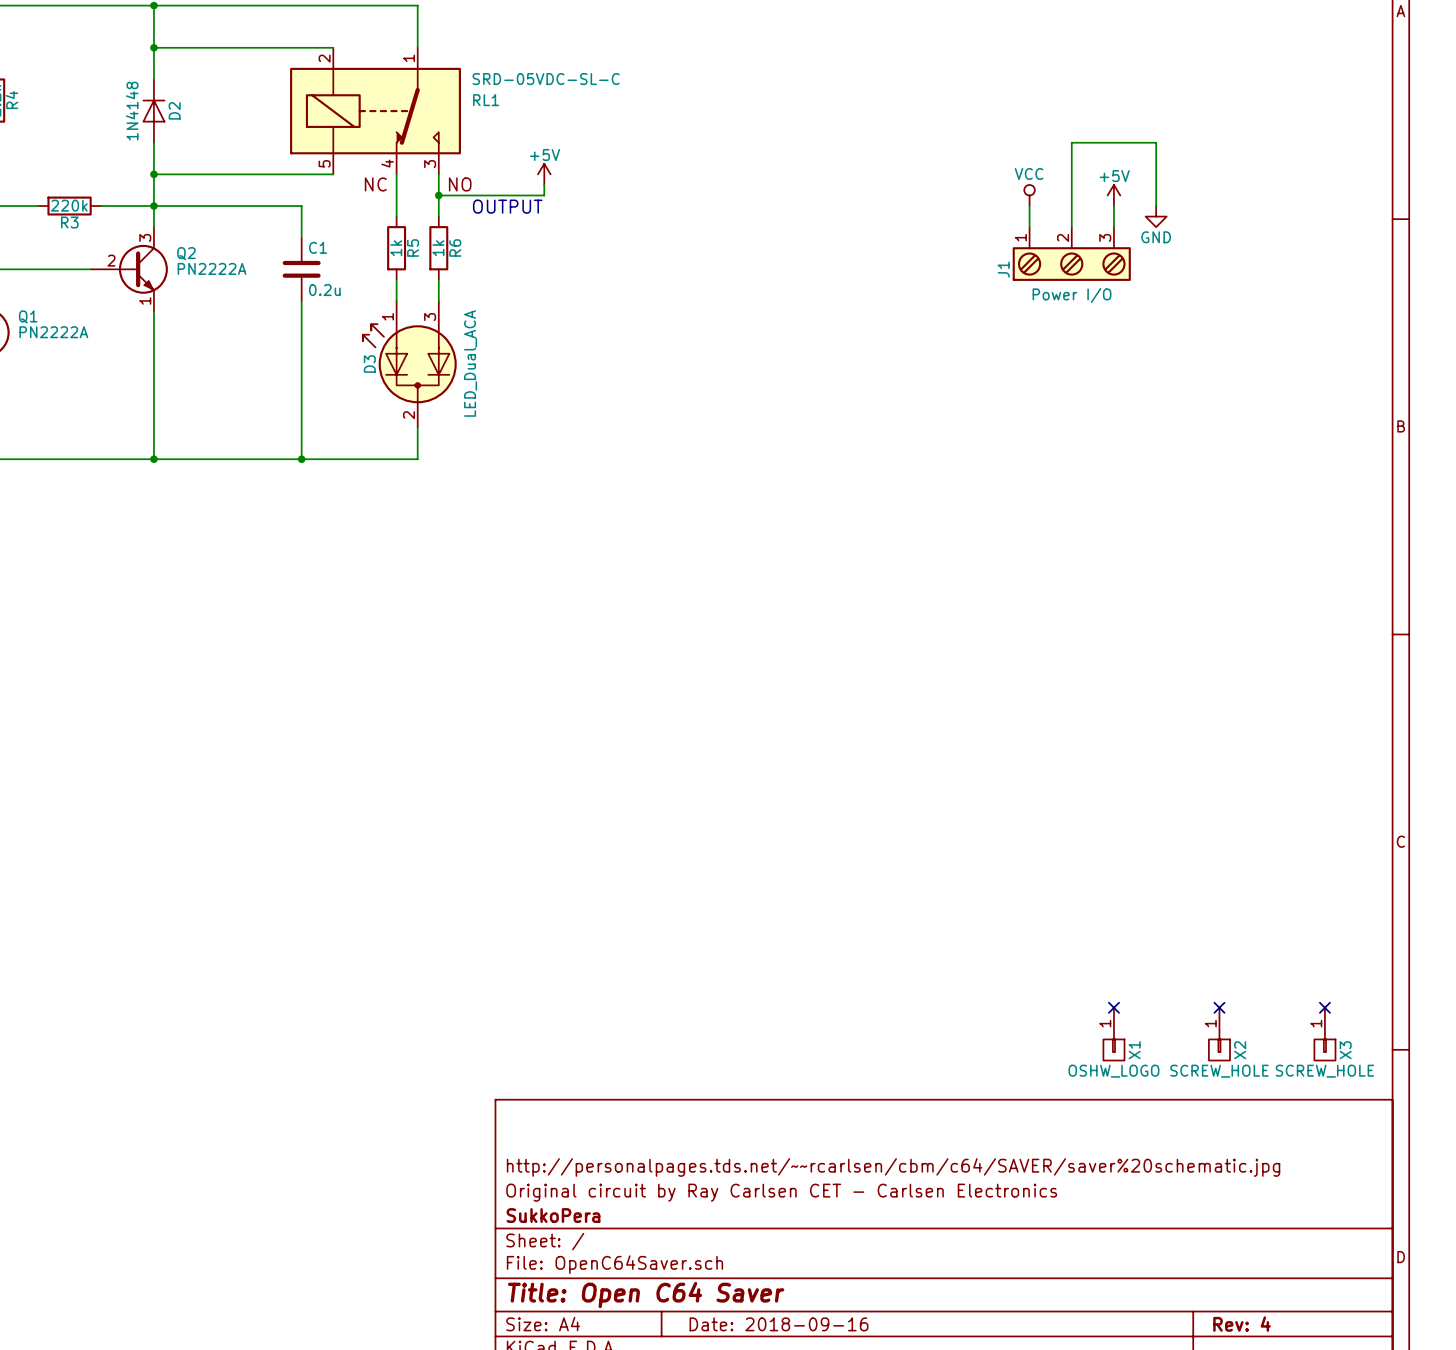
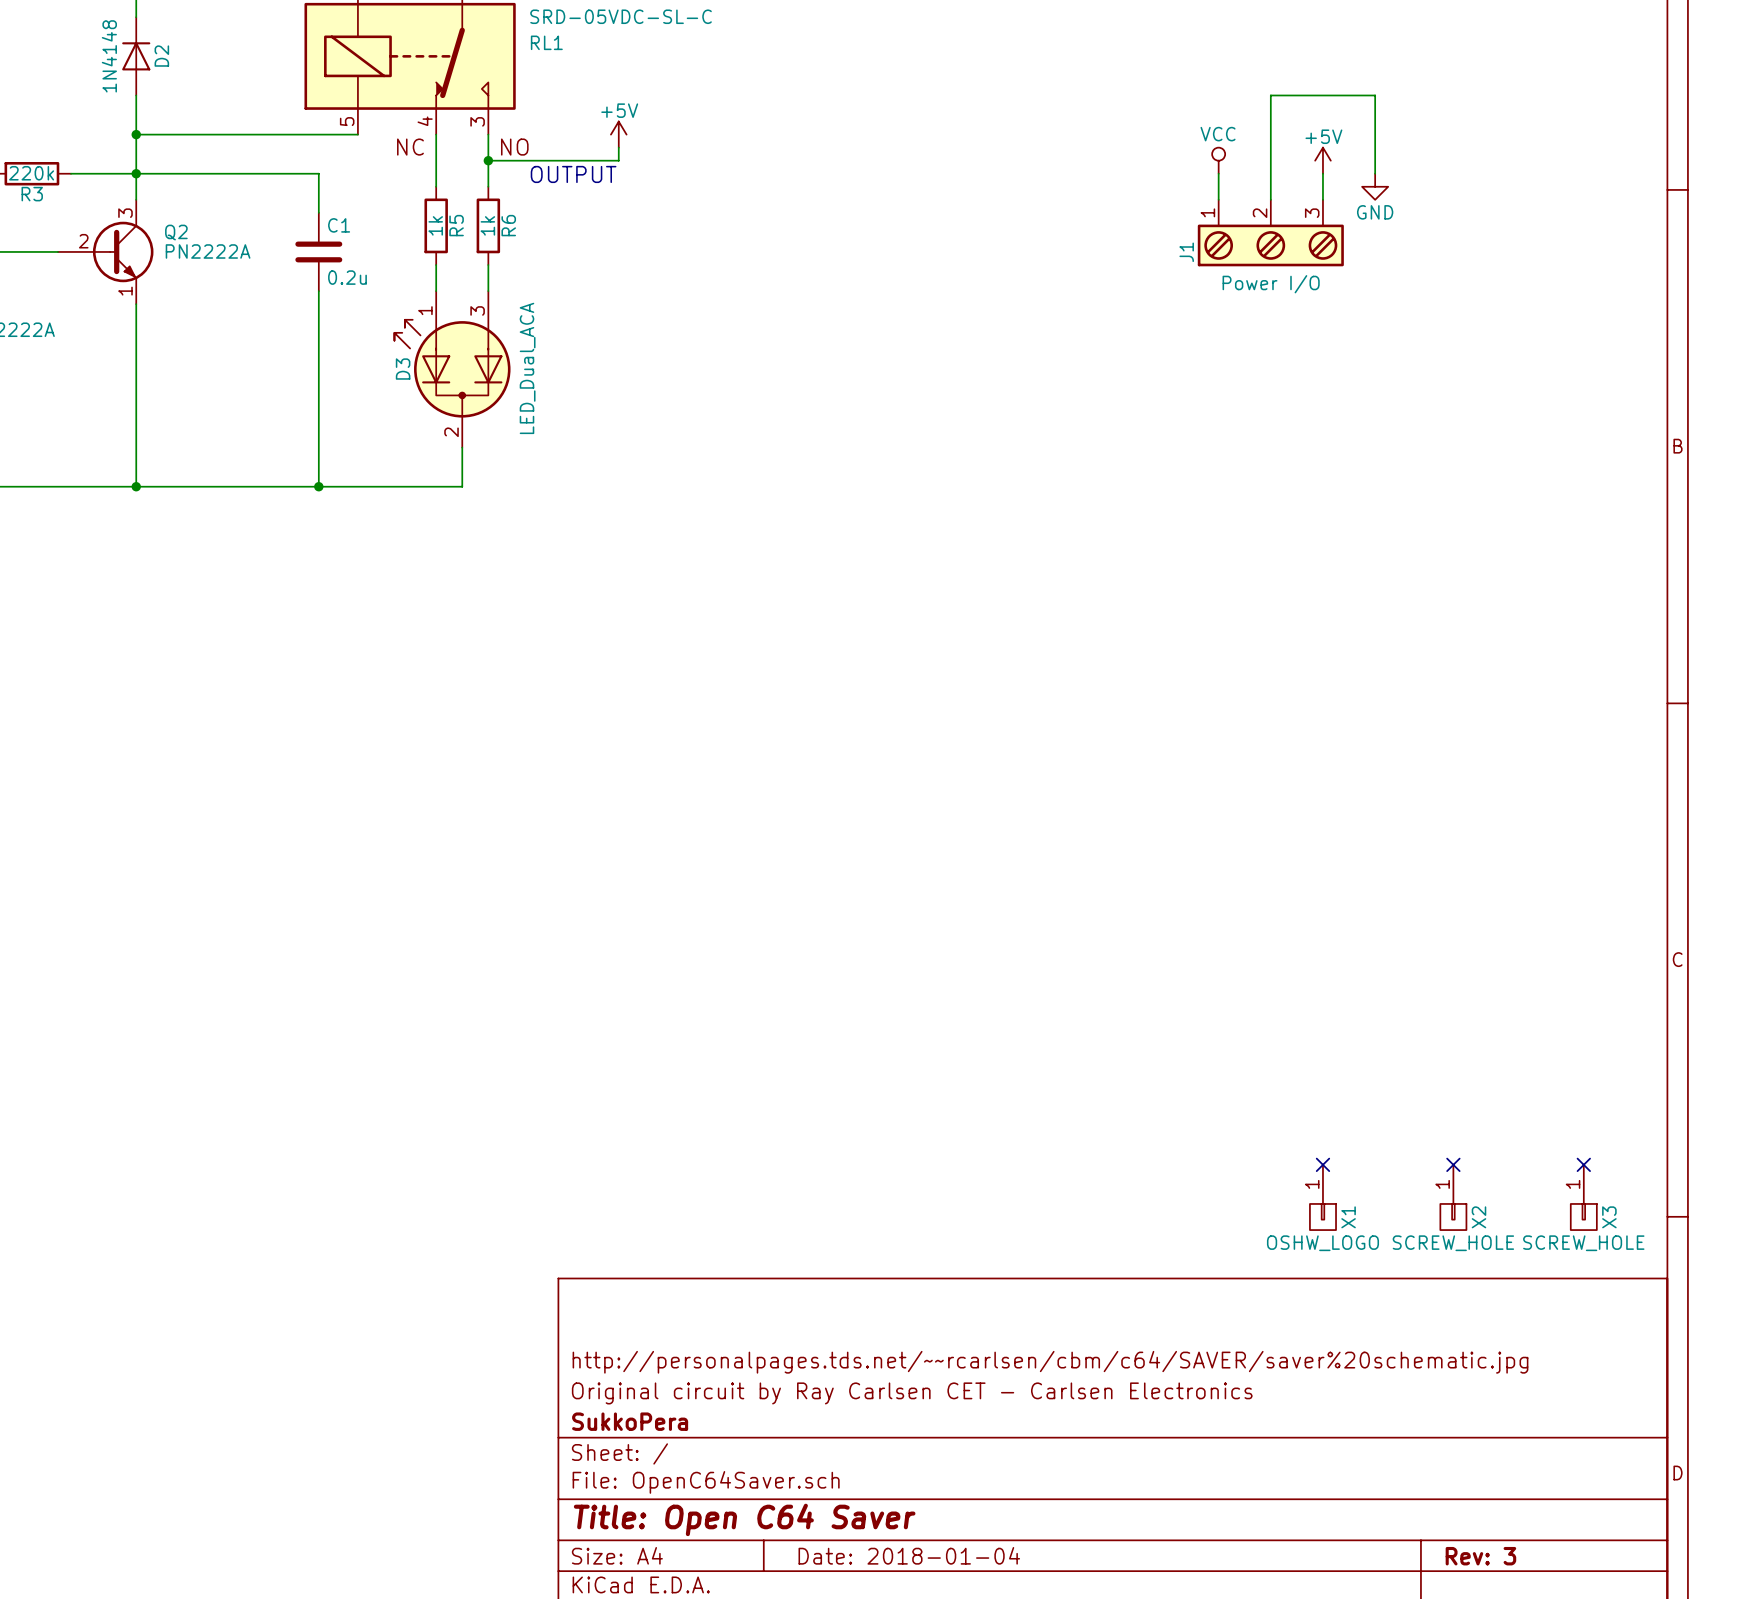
title block: Date: 2018-09-16 (779, 1324) -> Date: 2018-01-04 (909, 1555)
title block: Rev: 4 (1242, 1324) -> Rev: 3 (1480, 1556)

